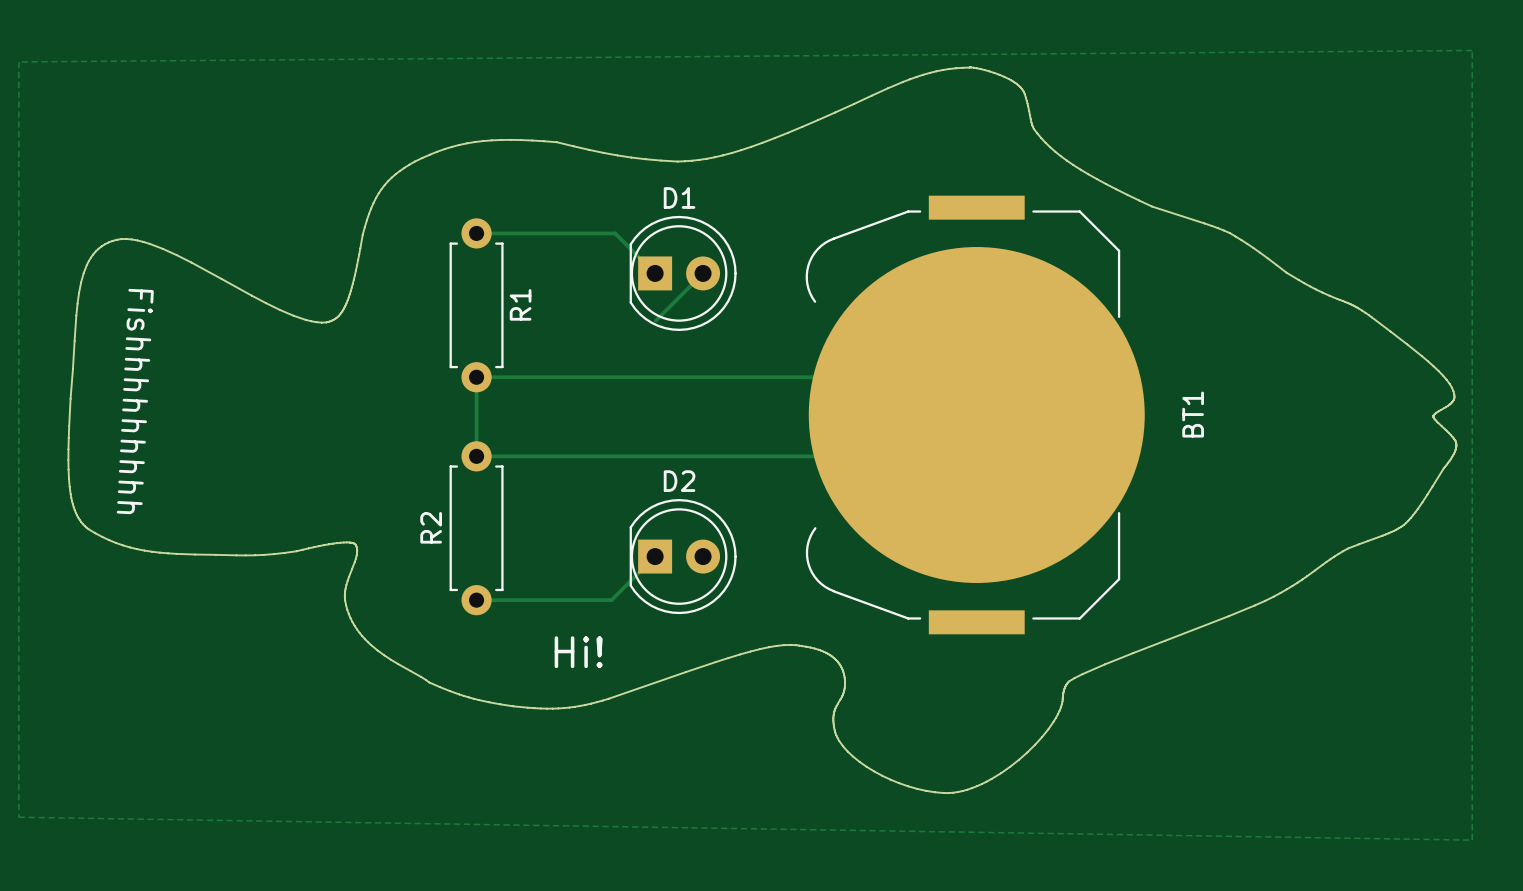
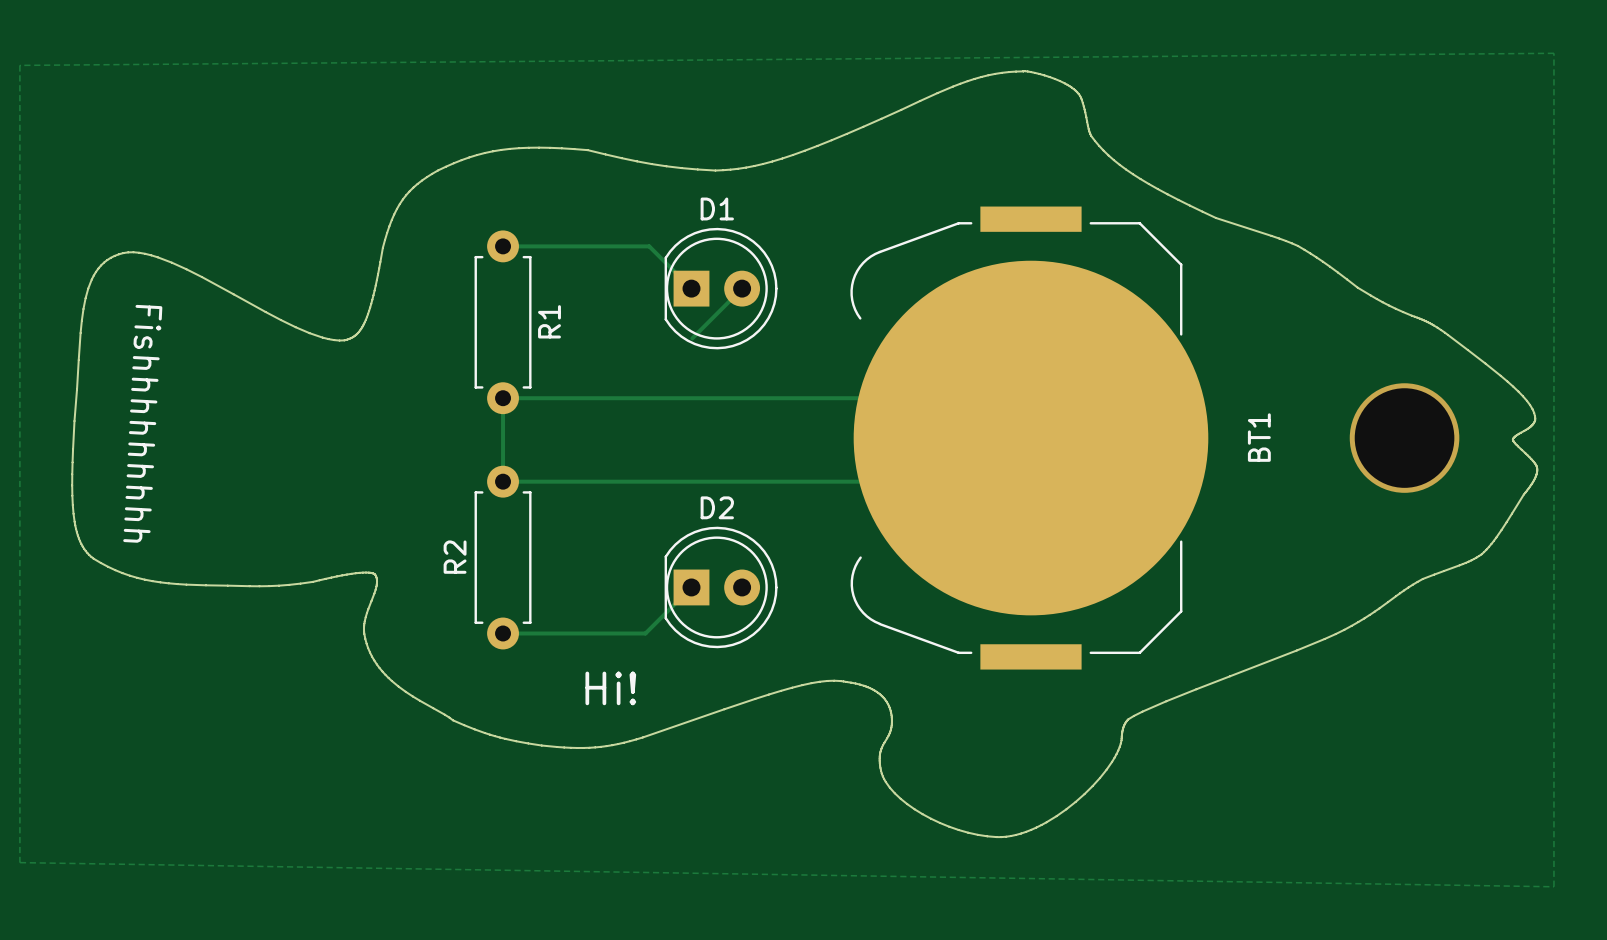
via: none -> (1404, 438)

